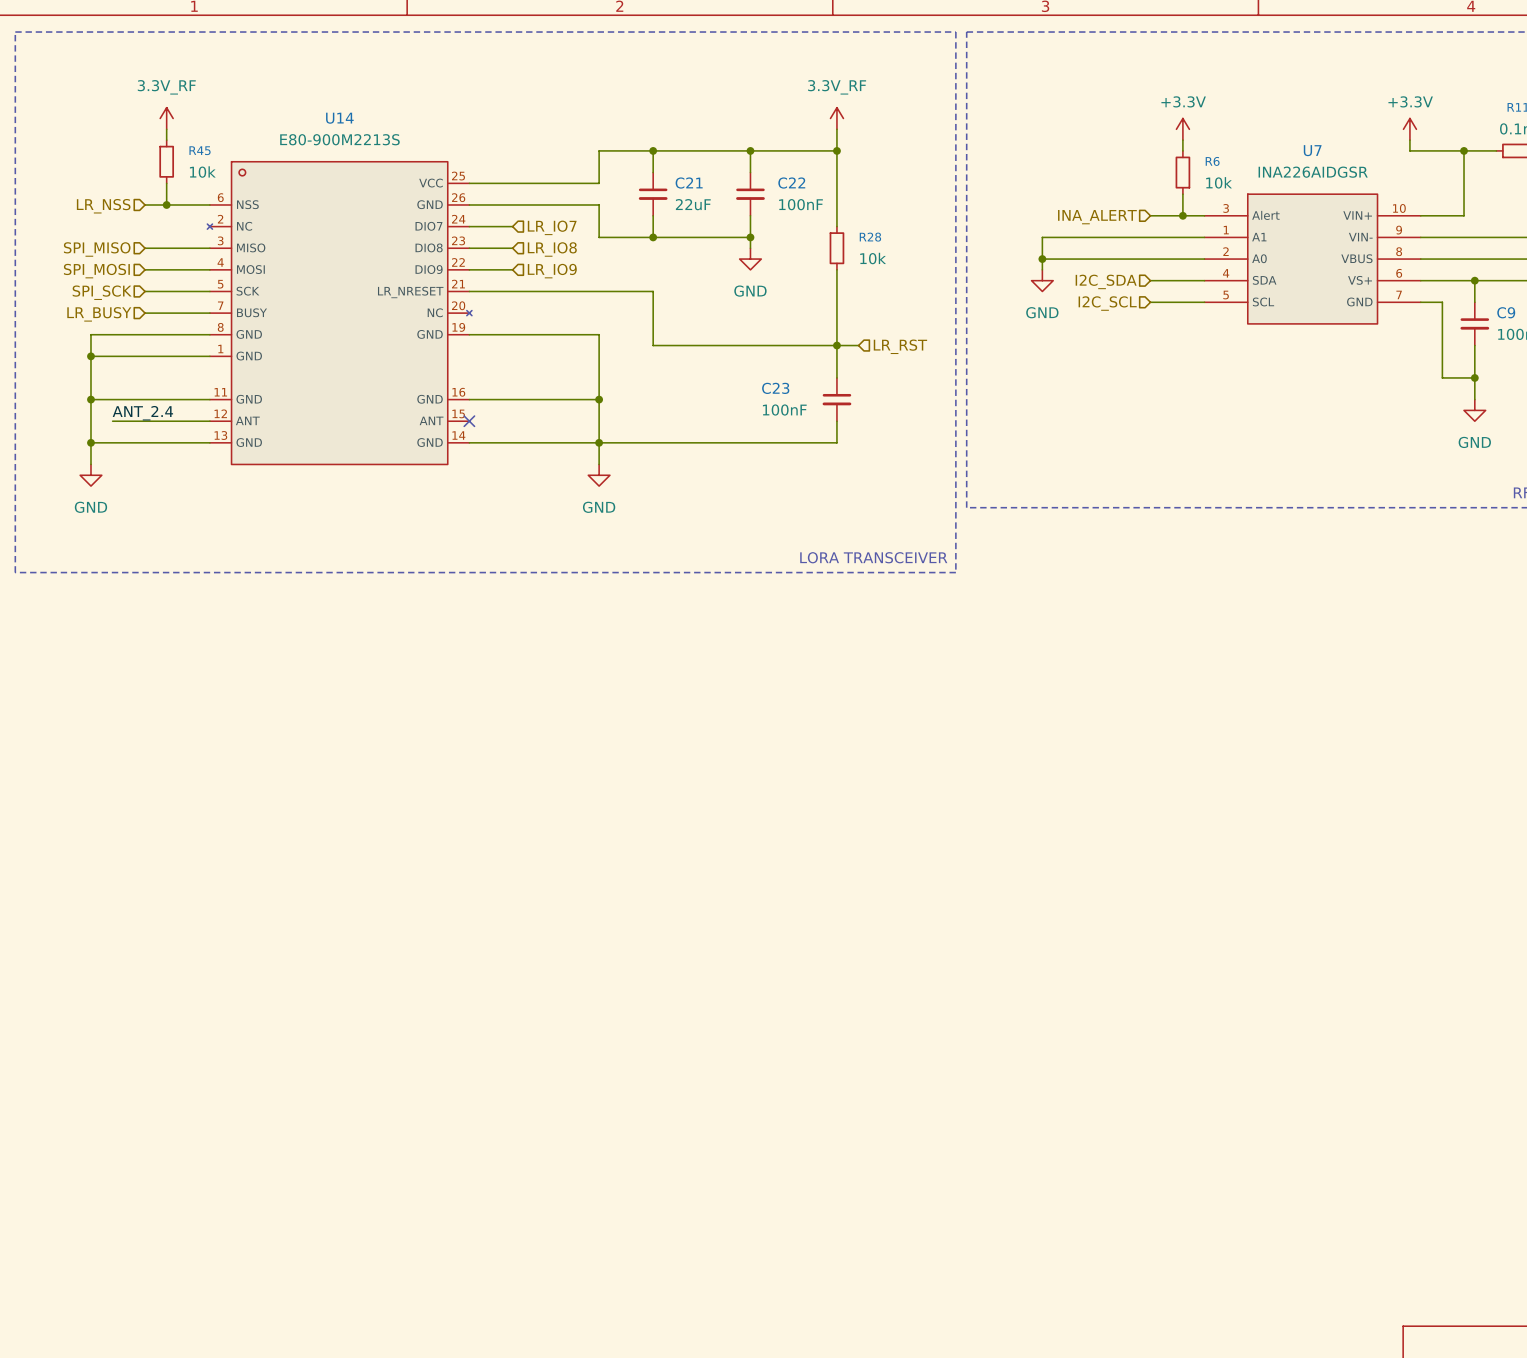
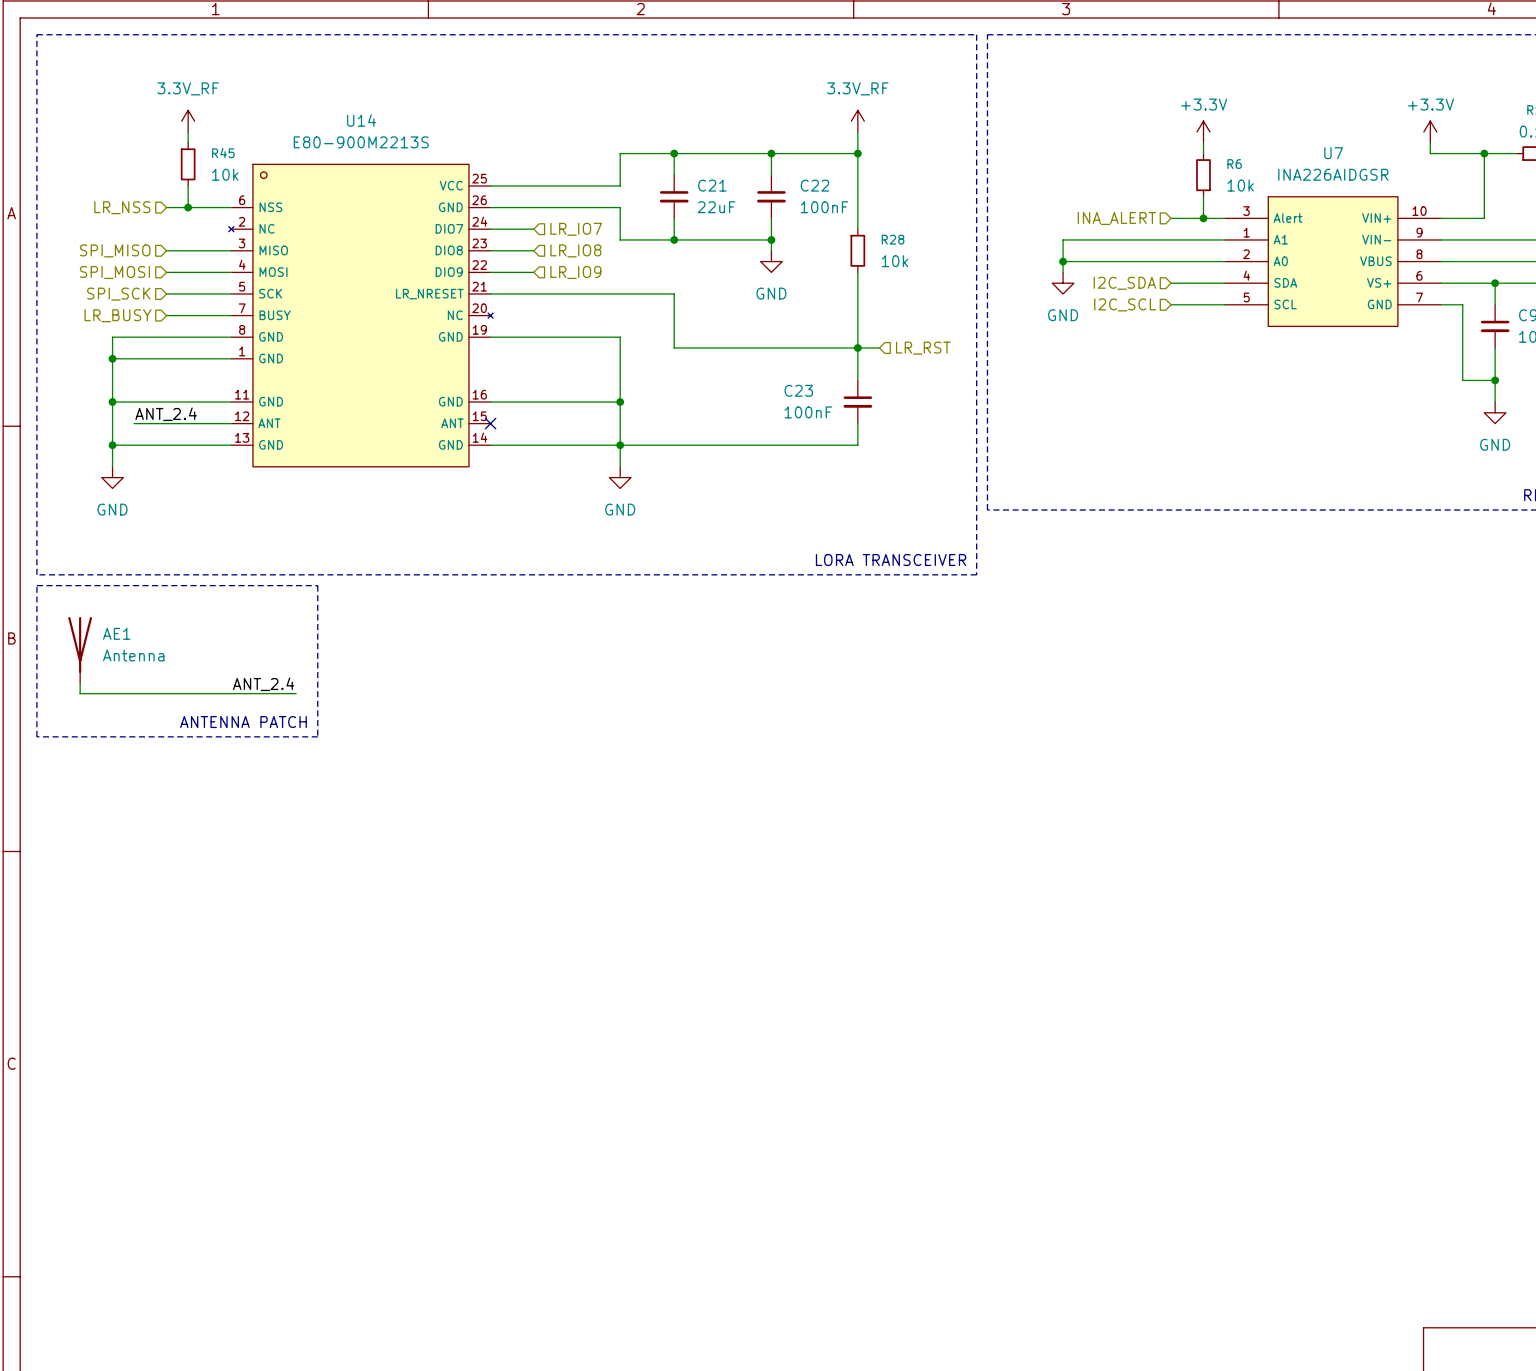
line: none -> (36, 585) (317, 585) (317, 736) (36, 736) (36, 585)
AE1: none -> Antenna (80, 649)
wire: none -> (80, 682) (80, 693) (296, 693)
label: none -> ANT_2.4 (263, 684)
text: none -> ANTENNA PATCH (243, 722)

